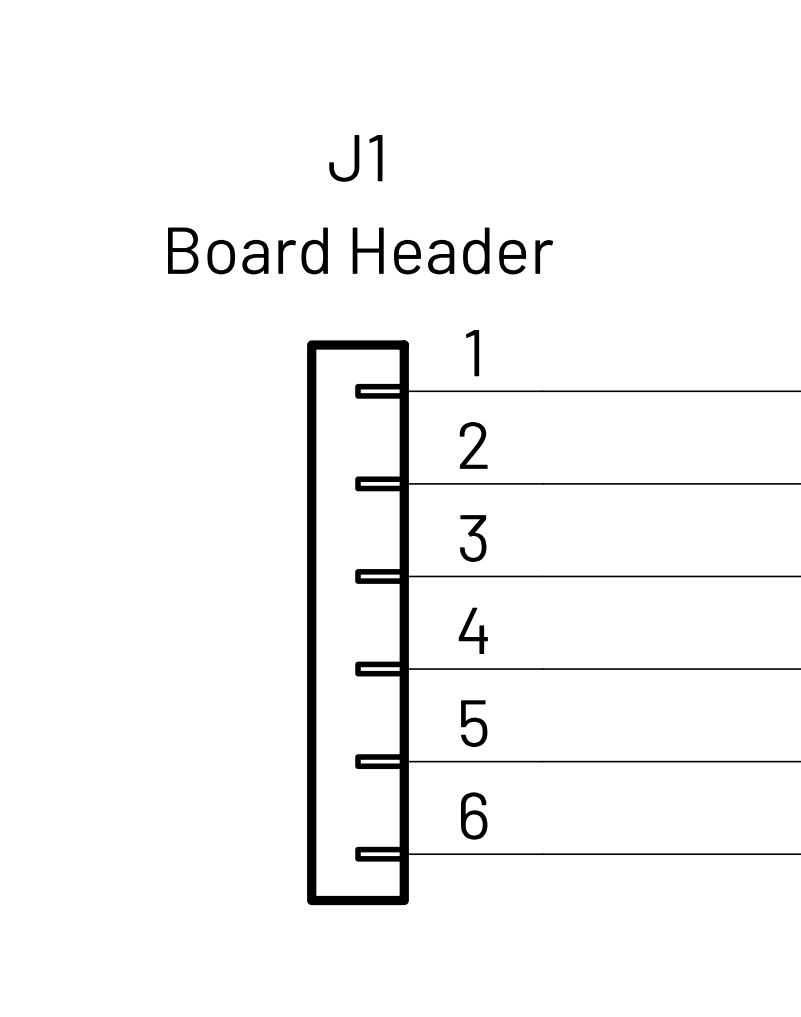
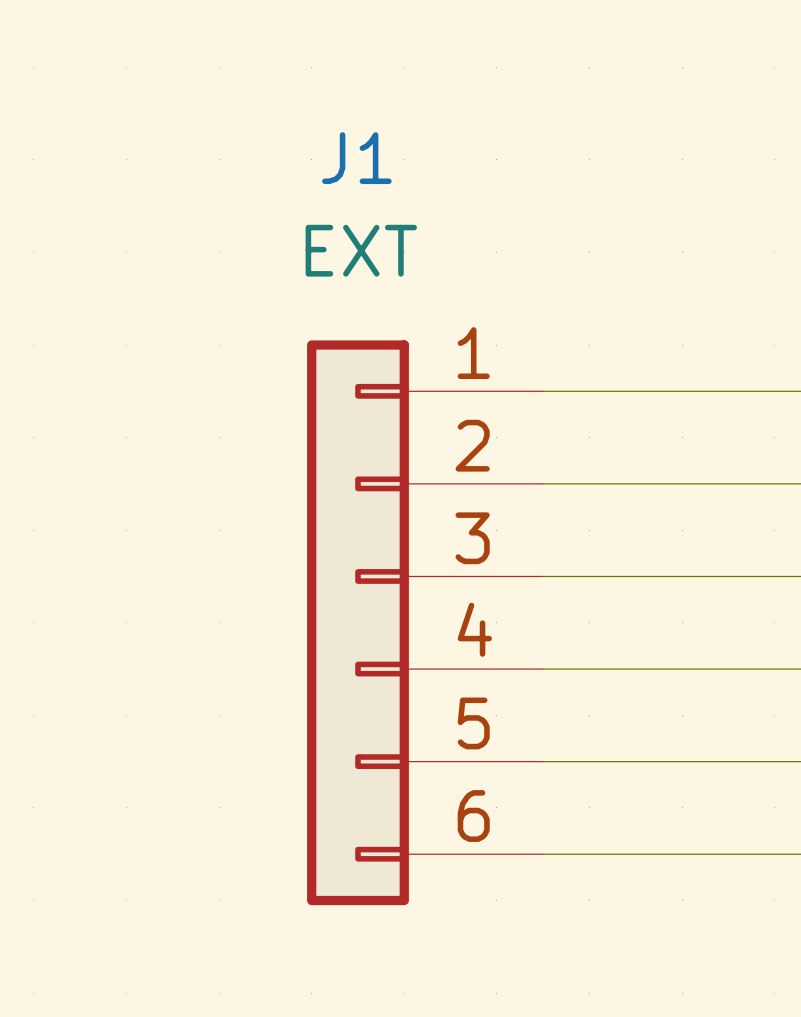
J1 value: Board Header (360, 251) -> EXT (361, 250)

